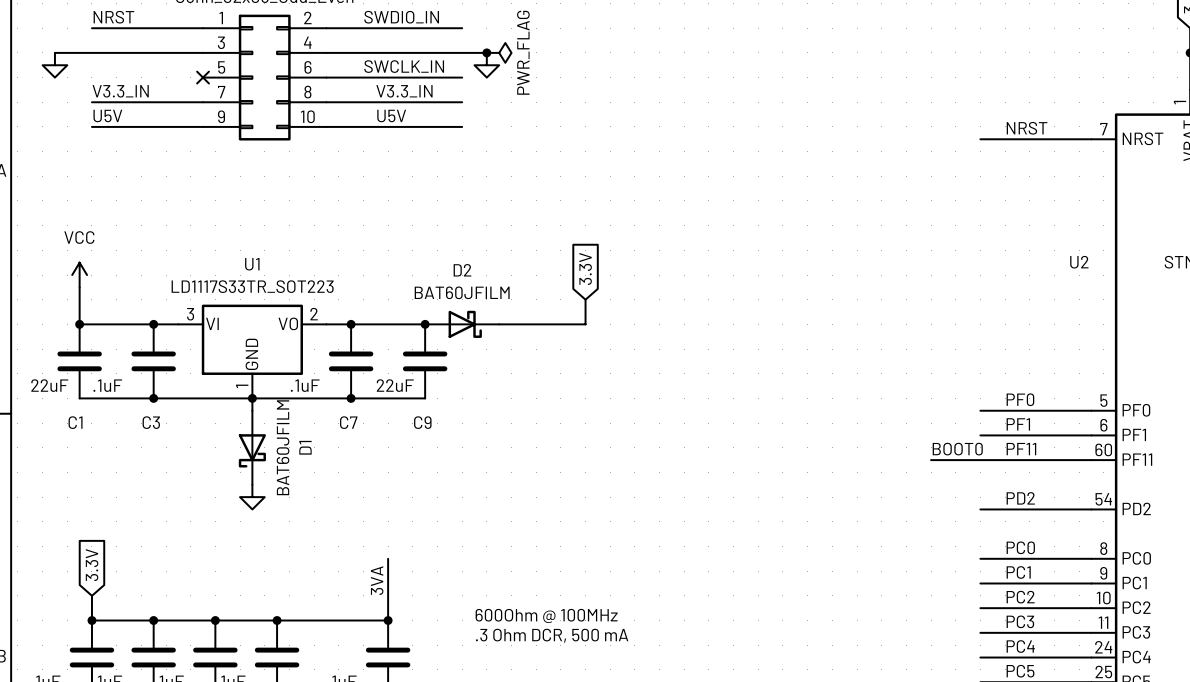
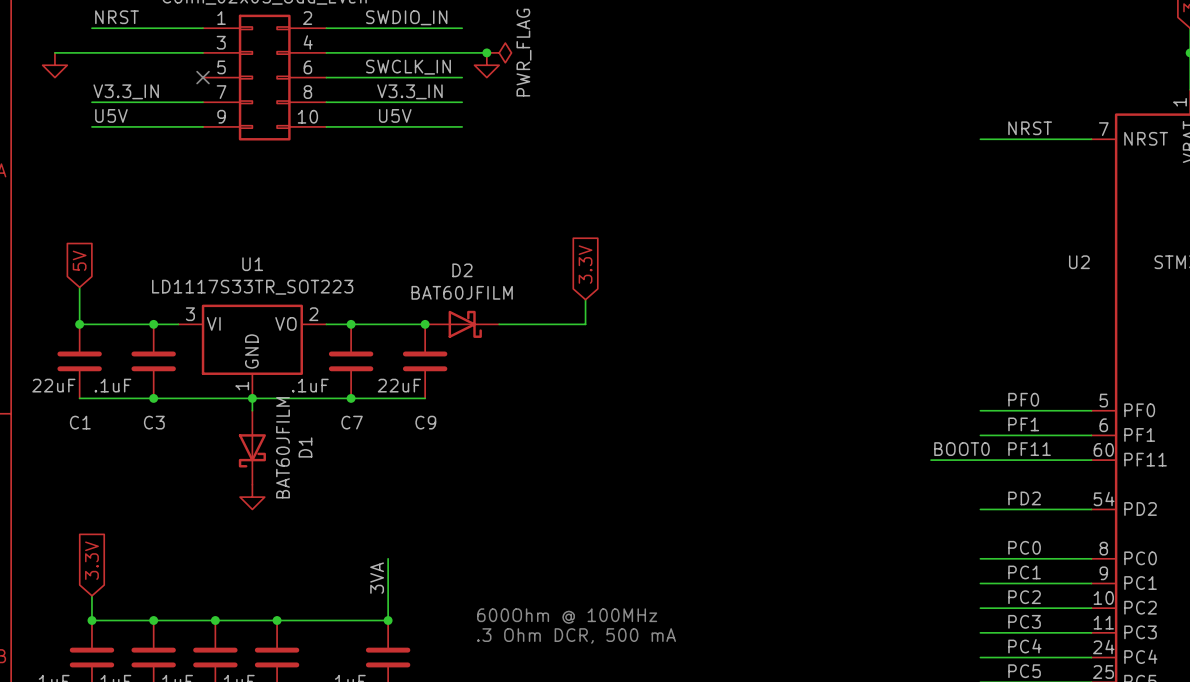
global label: none -> 5V (79, 260)
power symbol: VCC (79, 275) -> none

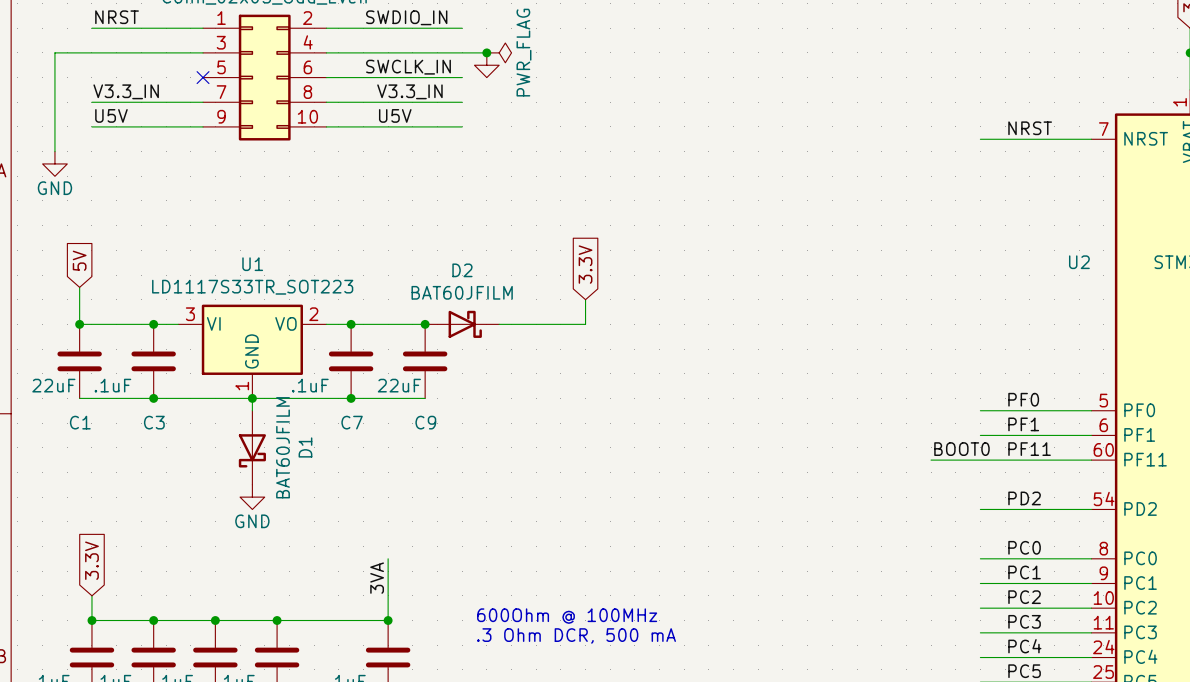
wire: none -> (54, 52) (54, 151)
power symbol: (54, 65) -> none
power symbol: none -> GND (54, 163)
power symbol text: none -> GND (252, 521)

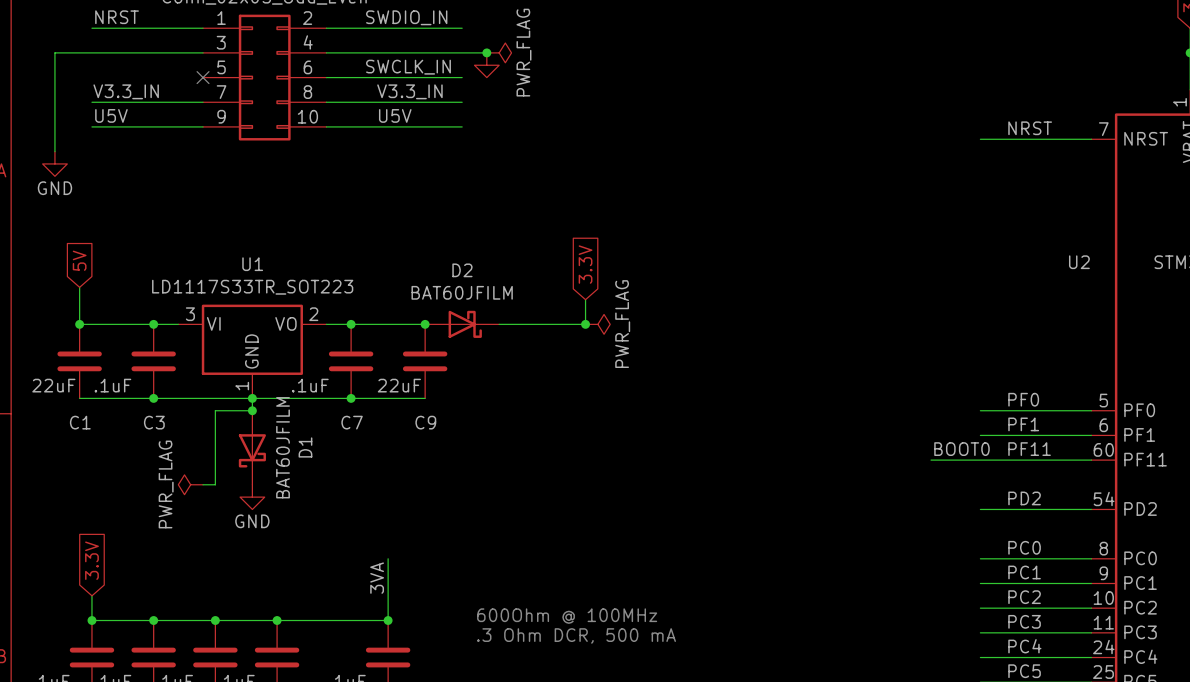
junction: none -> (585, 324)
power symbol: none -> PWR_FLAG (597, 324)
wire: none -> (252, 410) (215, 410) (215, 484) (203, 484)
junction: none -> (252, 410)
power symbol: none -> PWR_FLAG (190, 484)

